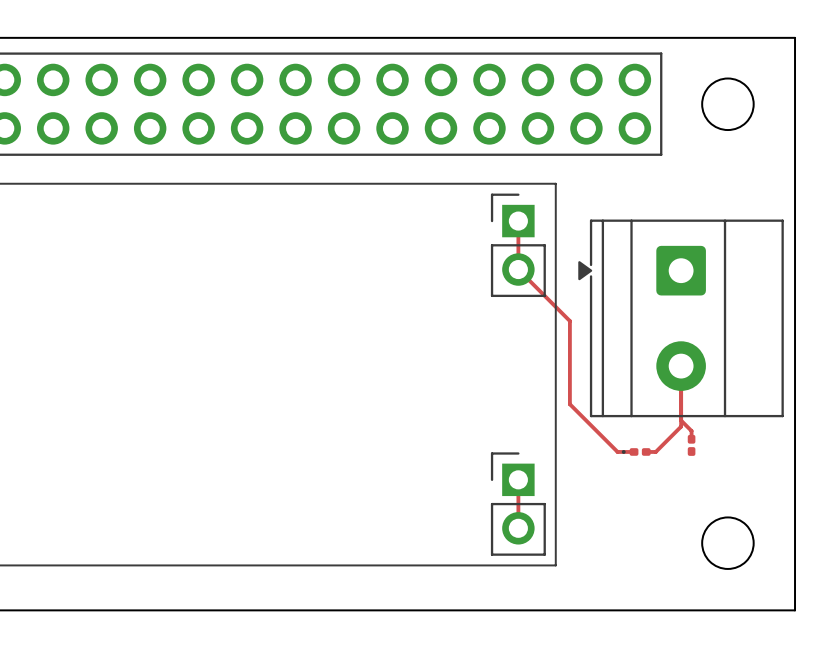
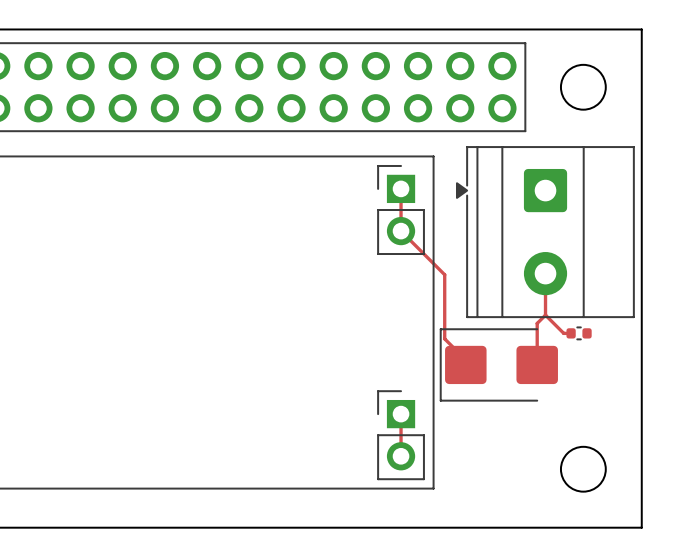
part position: (681, 318) -> (545, 232)
top track: none -> (545, 273) (545, 315)
top track: (568, 319) (569, 404) (617, 451) (634, 451) -> (444, 274) (444, 338) (465, 359) (465, 364)
top track: (681, 366) (681, 426) (655, 451) (646, 451) -> none
top track: none -> (545, 315) (563, 333) (571, 333)
top track: none -> (545, 315) (537, 323) (537, 364)
part: none -> (579, 333)
top track: (681, 420) (691, 430) -> none
part: none -> (498, 364)
part: (691, 445) -> none
part: (636, 451) -> none

